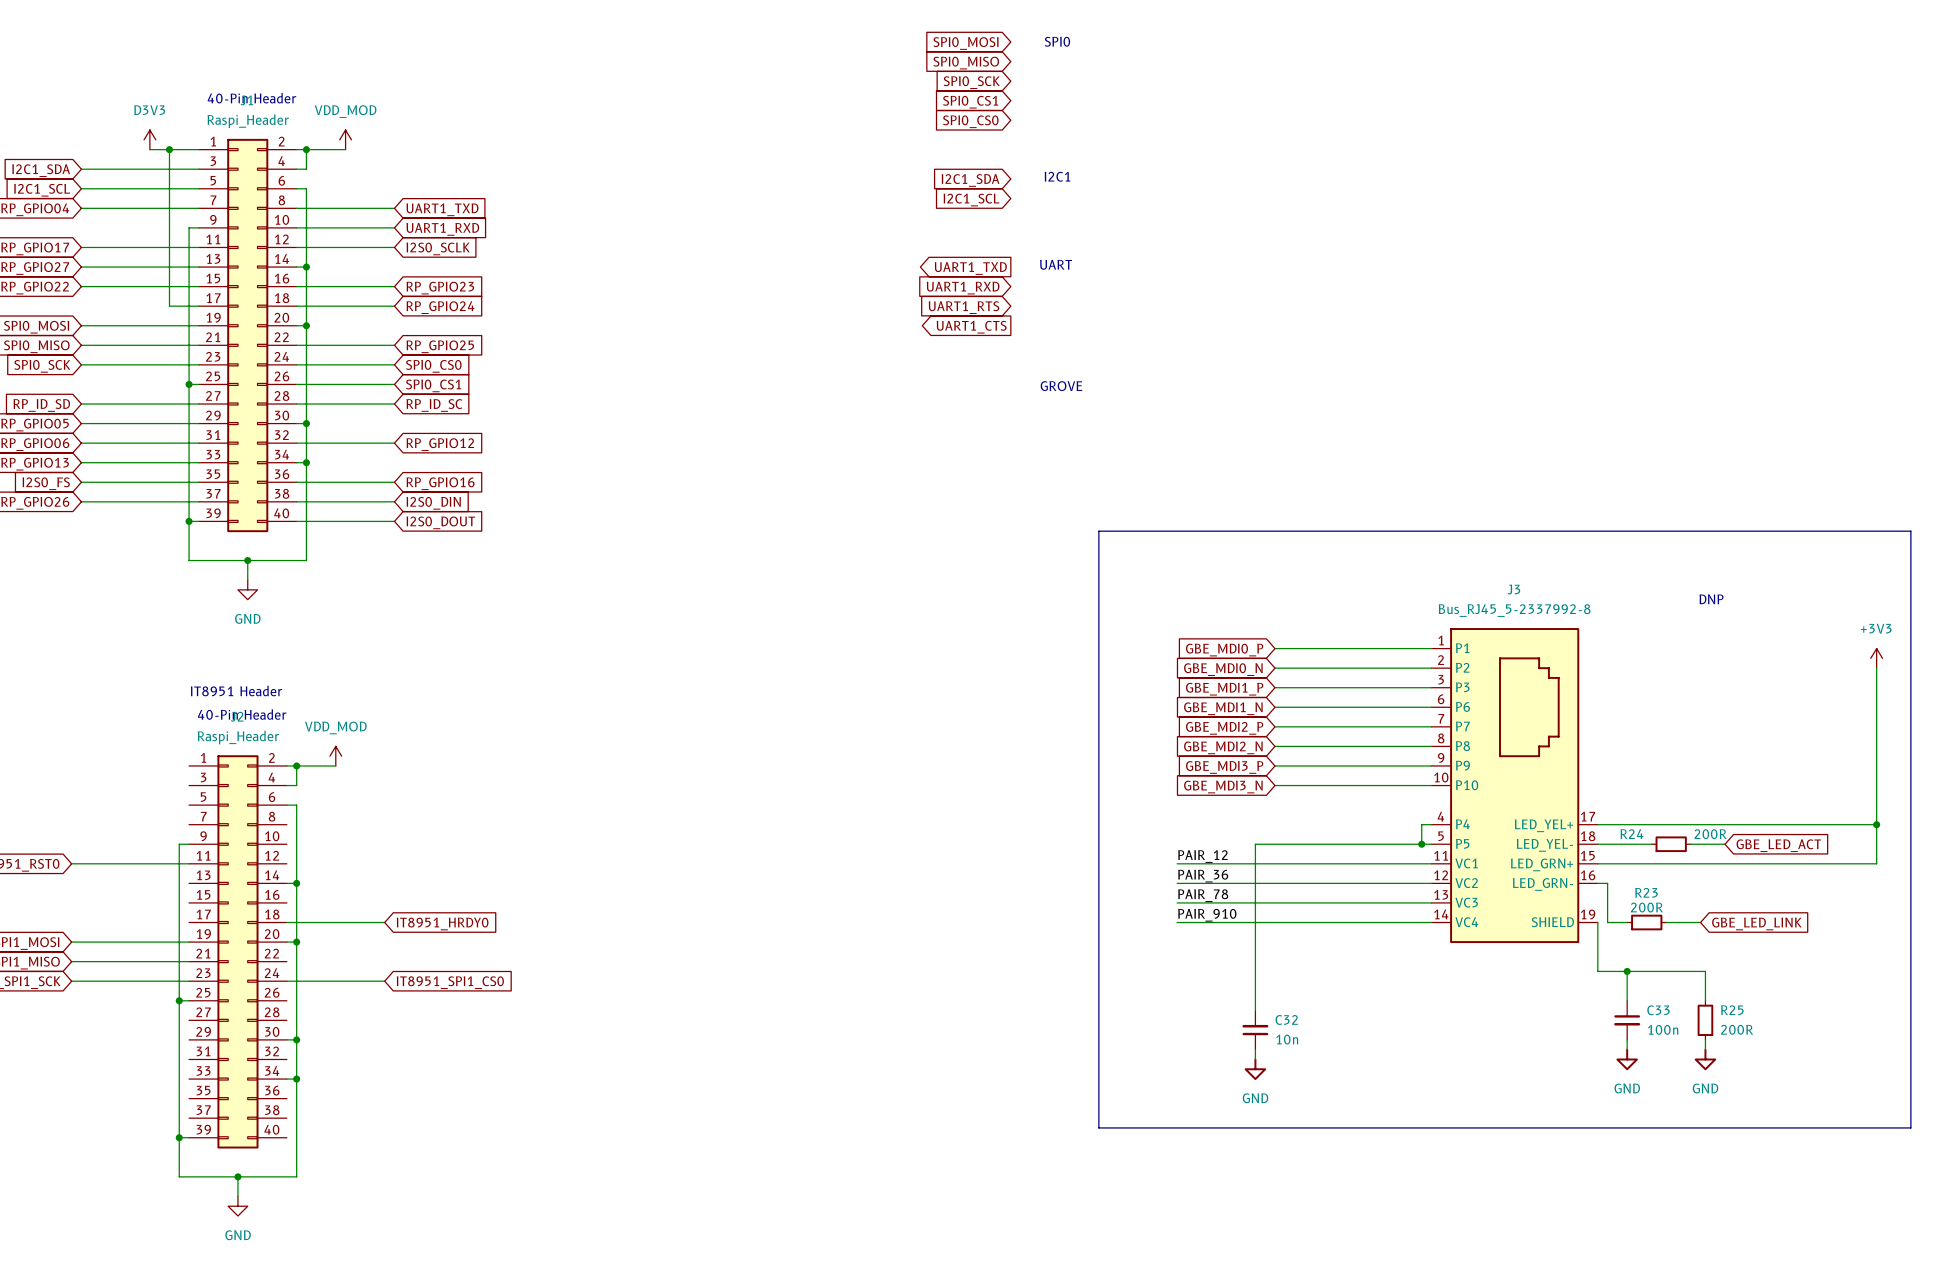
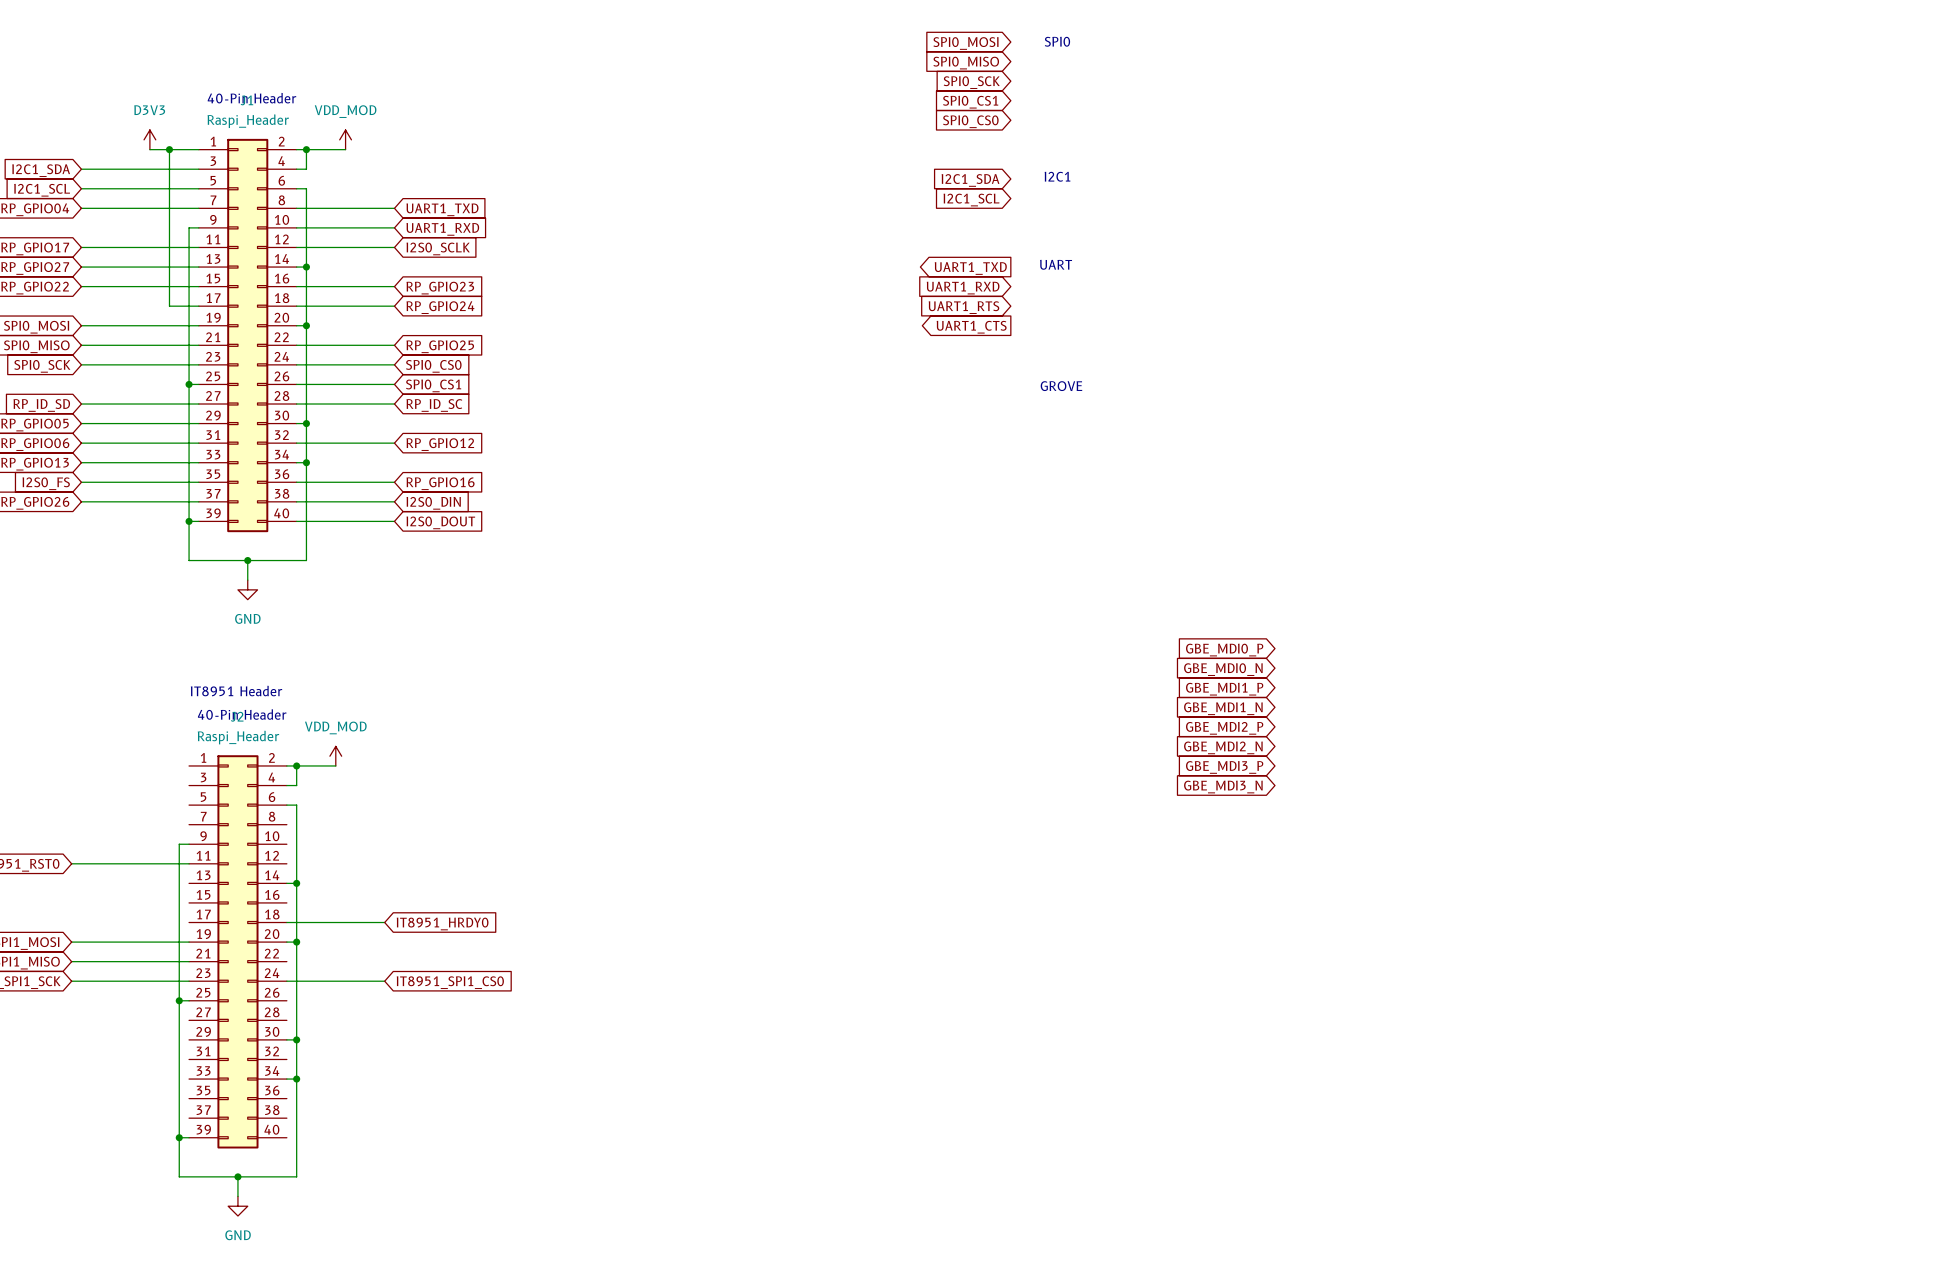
line: (1098, 531) (1910, 531) (1910, 1127) (1098, 1127) (1098, 531) -> none
text: DNP (1711, 599) -> none
wire: (1274, 648) (1431, 648) -> none
power symbol: +3V3 (1876, 658) -> none
wire: (1274, 668) (1431, 668) -> none
wire: (1876, 668) (1876, 863) (1597, 863) -> none
wire: (1274, 687) (1431, 687) -> none
wire: (1274, 707) (1431, 707) -> none
wire: (1274, 726) (1431, 726) -> none
wire: (1274, 746) (1431, 746) -> none
wire: (1274, 765) (1431, 765) -> none
wire: (1274, 785) (1431, 785) -> none
J3: Bus_RJ45_5-2337992-8 (1514, 785) -> none
wire: (1431, 824) (1421, 824) (1421, 844) -> none
wire: (1597, 824) (1876, 824) -> none
junction: (1876, 824) -> none
junction: (1421, 844) -> none
wire: (1431, 844) (1255, 844) (1255, 1010) -> none
wire: (1597, 844) (1651, 844) -> none
R24: (1671, 844) -> none
wire: (1690, 844) (1725, 844) -> none
global label: GBE_LED_ACT (1778, 845) -> none
label: PAIR_12 (1202, 856) -> none
wire: (1177, 863) (1431, 863) -> none
label: PAIR_36 (1203, 876) -> none
wire: (1177, 883) (1431, 883) -> none
wire: (1597, 883) (1607, 883) (1607, 922) (1627, 922) -> none
label: PAIR_78 (1203, 895) -> none
wire: (1177, 902) (1431, 902) -> none
label: PAIR_910 (1207, 915) -> none
wire: (1177, 922) (1431, 922) -> none
wire: (1597, 922) (1597, 971) (1705, 971) (1705, 1000) -> none
R23: (1646, 922) -> none
wire: (1666, 922) (1700, 922) -> none
global label: GBE_LED_LINK (1756, 923) -> none
wire: (1627, 971) (1627, 1000) -> none
junction: (1627, 971) -> none
C33: (1627, 1020) -> none
R25: (1705, 1020) -> none
C32: (1255, 1030) -> none
wire: (1627, 1039) (1627, 1049) -> none
wire: (1705, 1039) (1705, 1049) -> none
wire: (1255, 1049) (1255, 1059) -> none
power symbol: GND (1627, 1059) -> none
power symbol: GND (1705, 1059) -> none
power symbol: GND (1255, 1069) -> none

